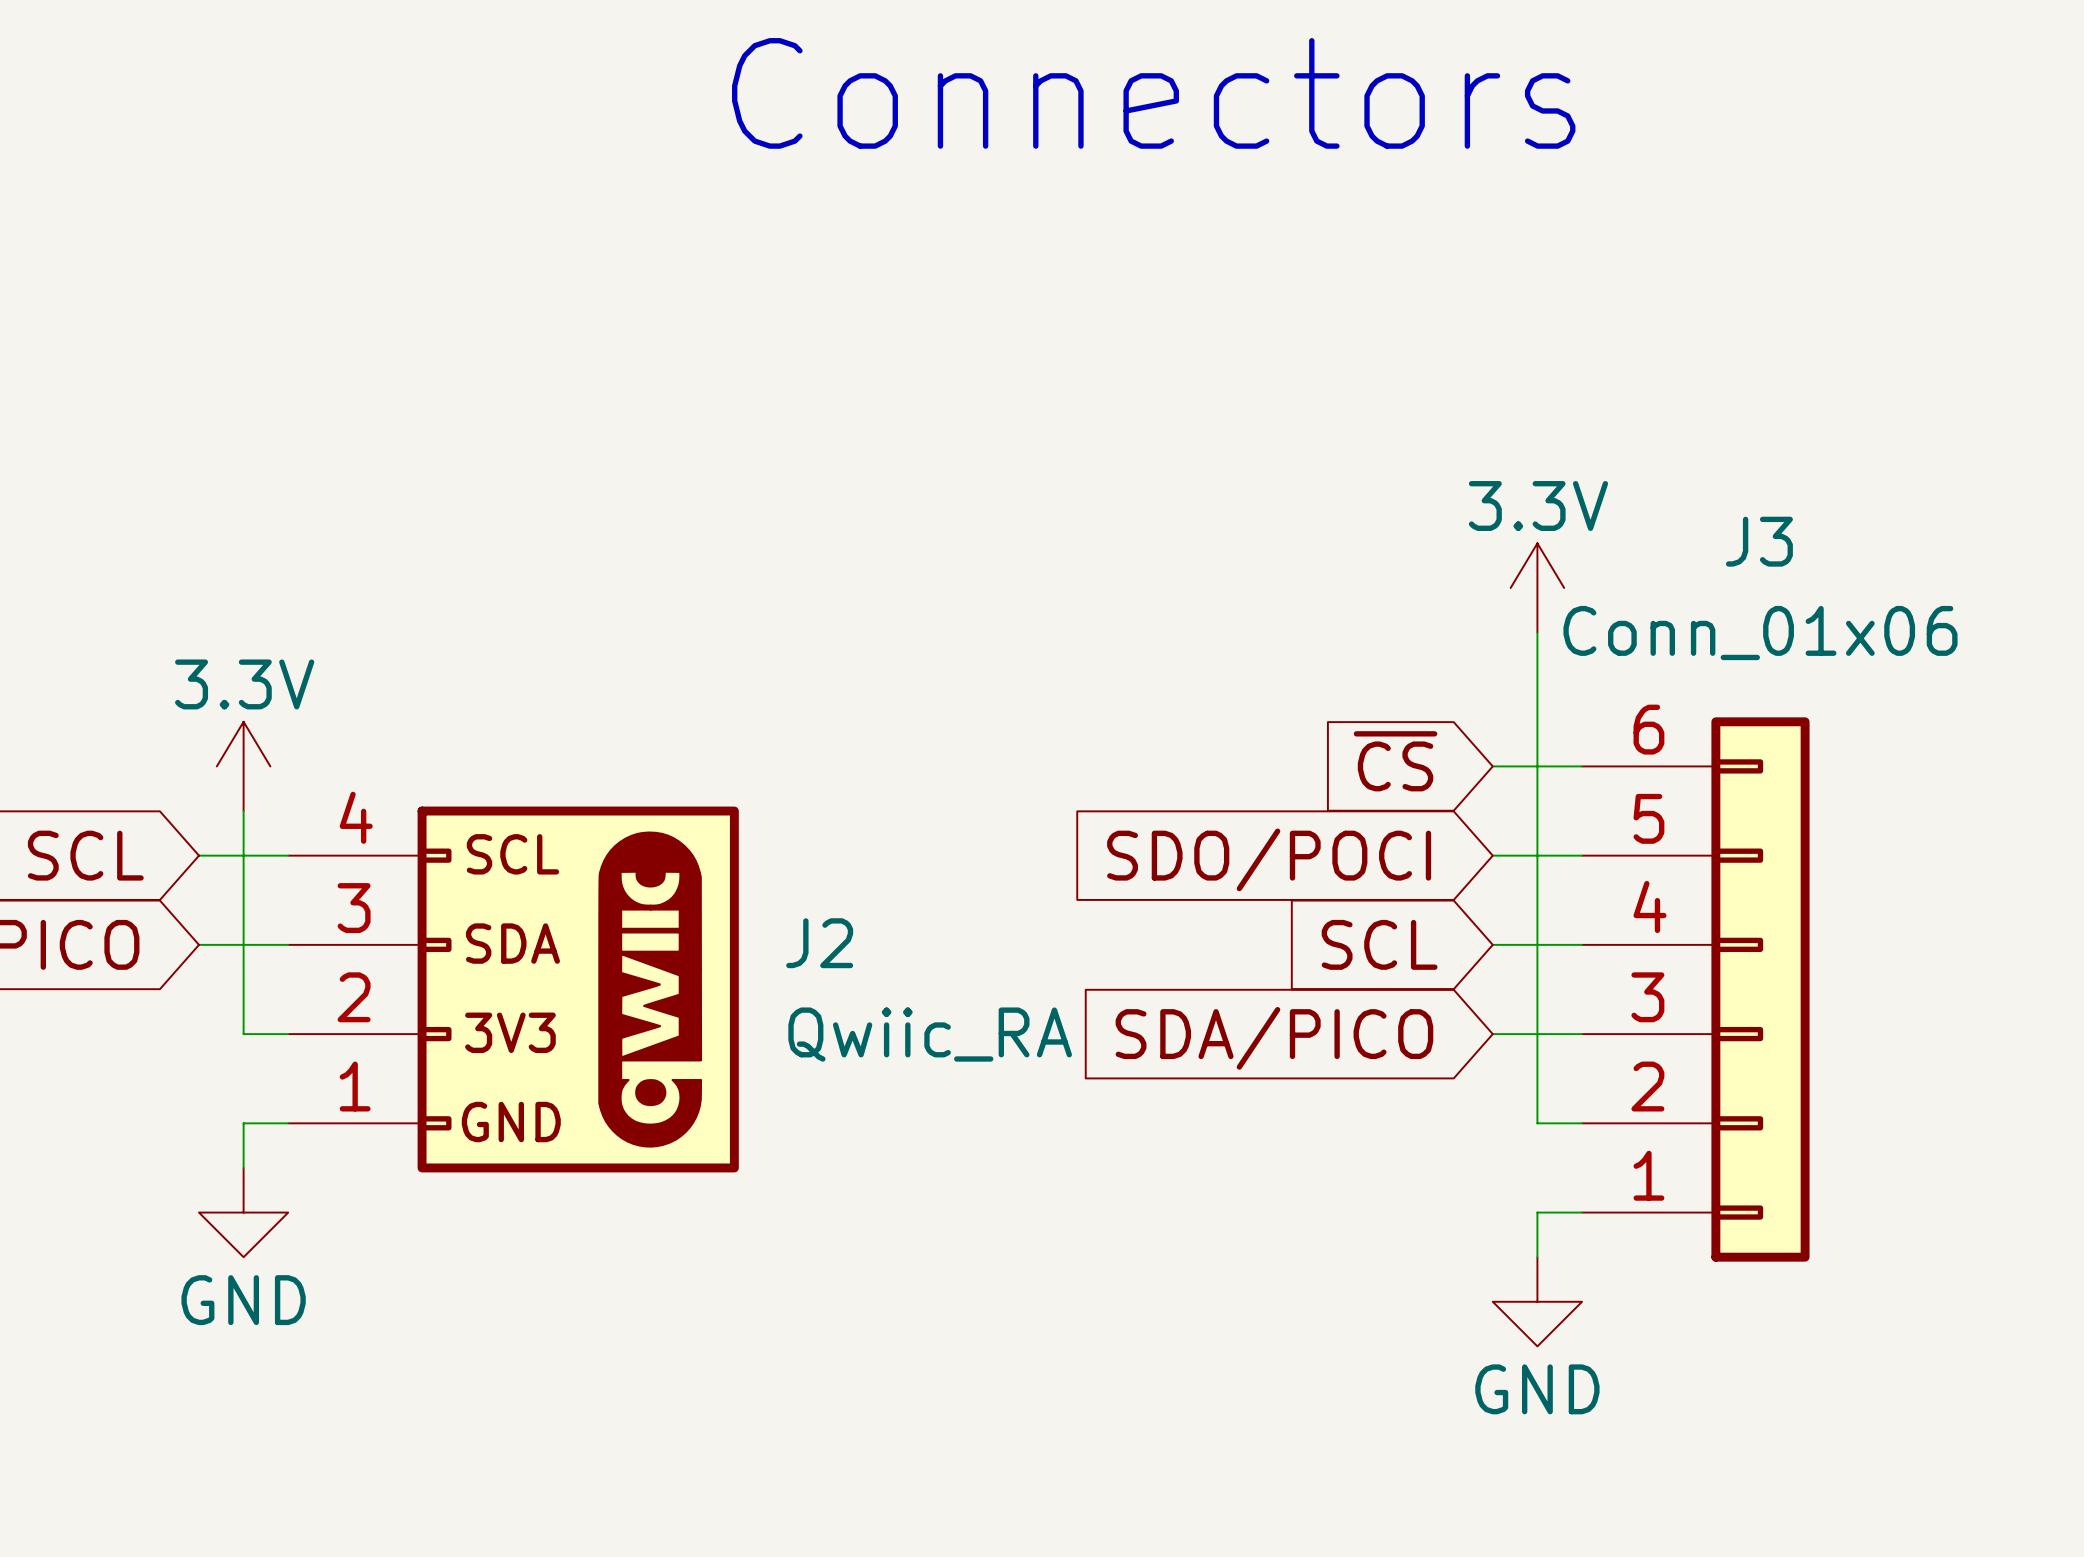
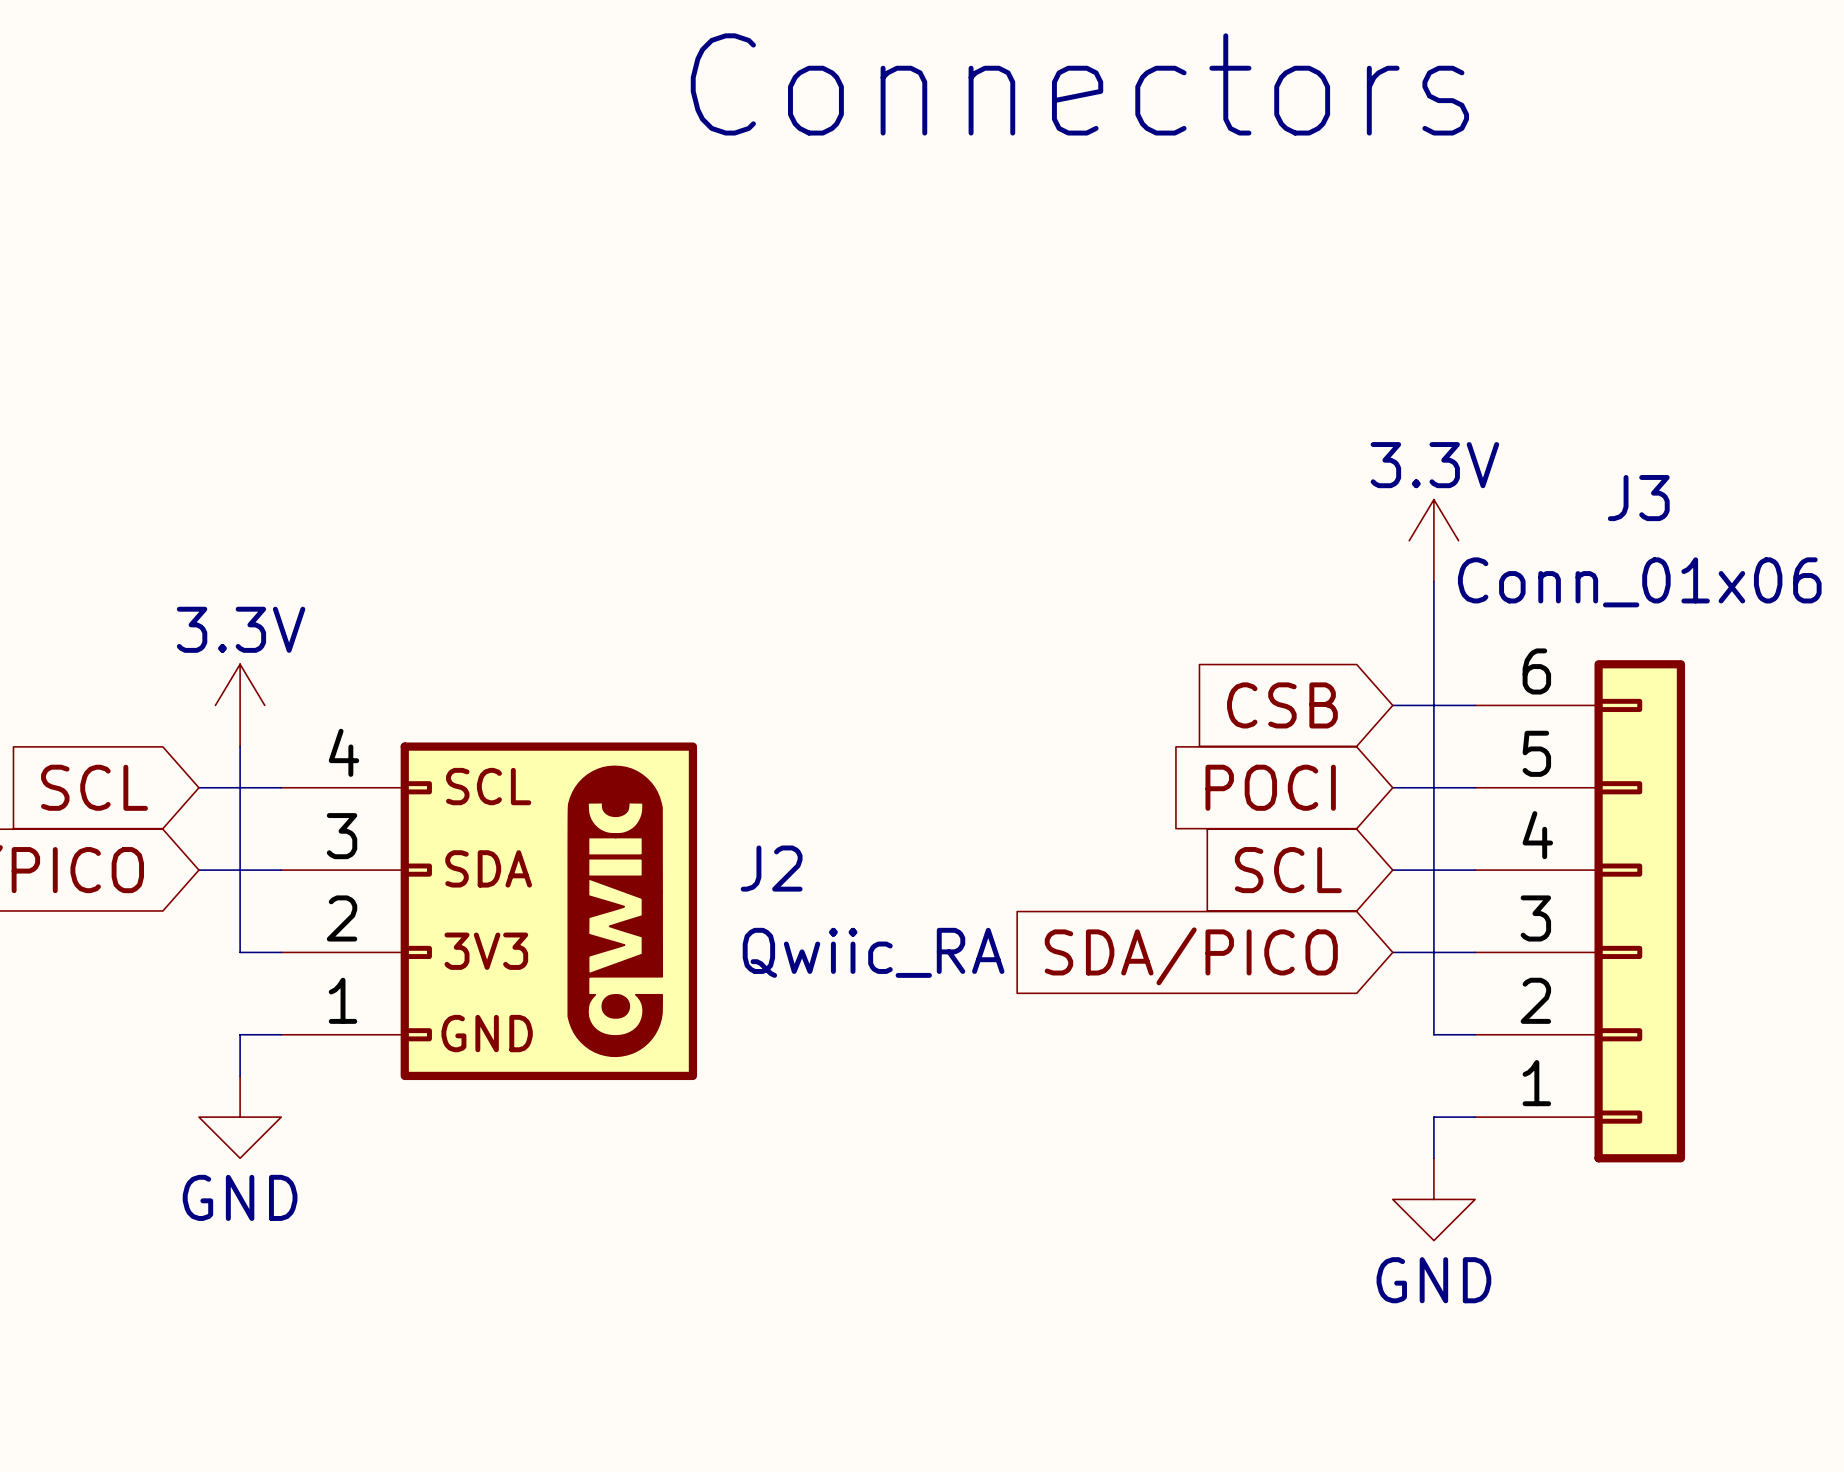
global label: ~{CS} (1395, 761) -> CSB (1282, 705)
global label: SDO/POCI (1269, 859) -> POCI (1270, 787)

